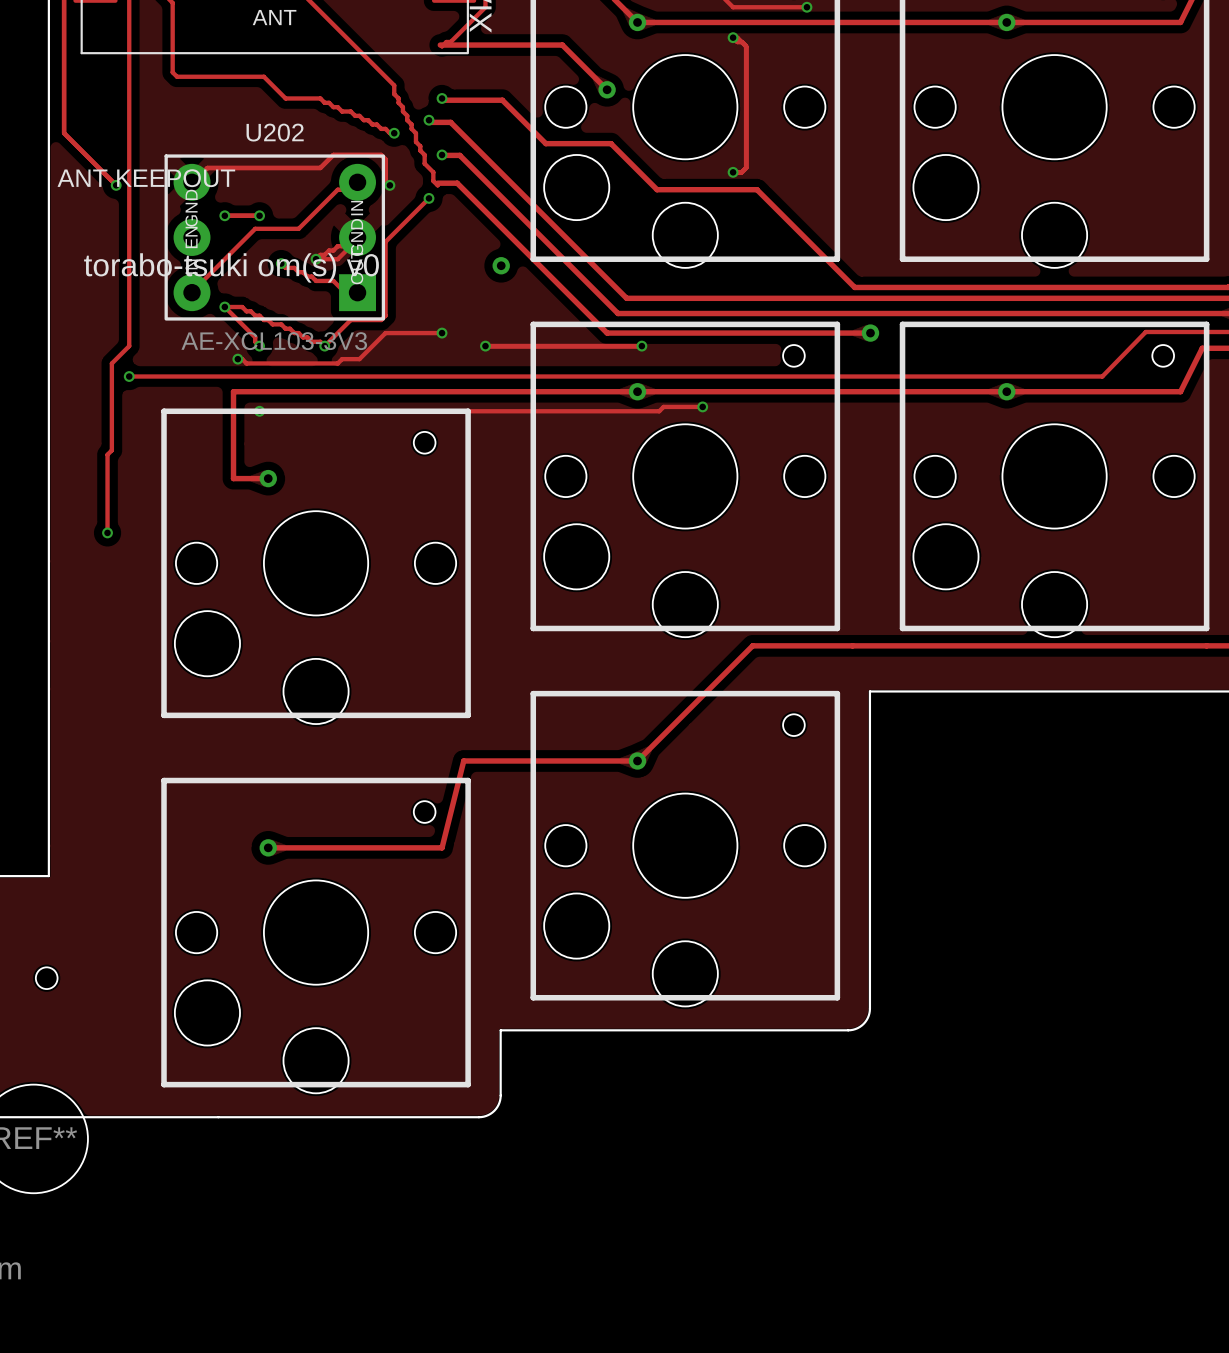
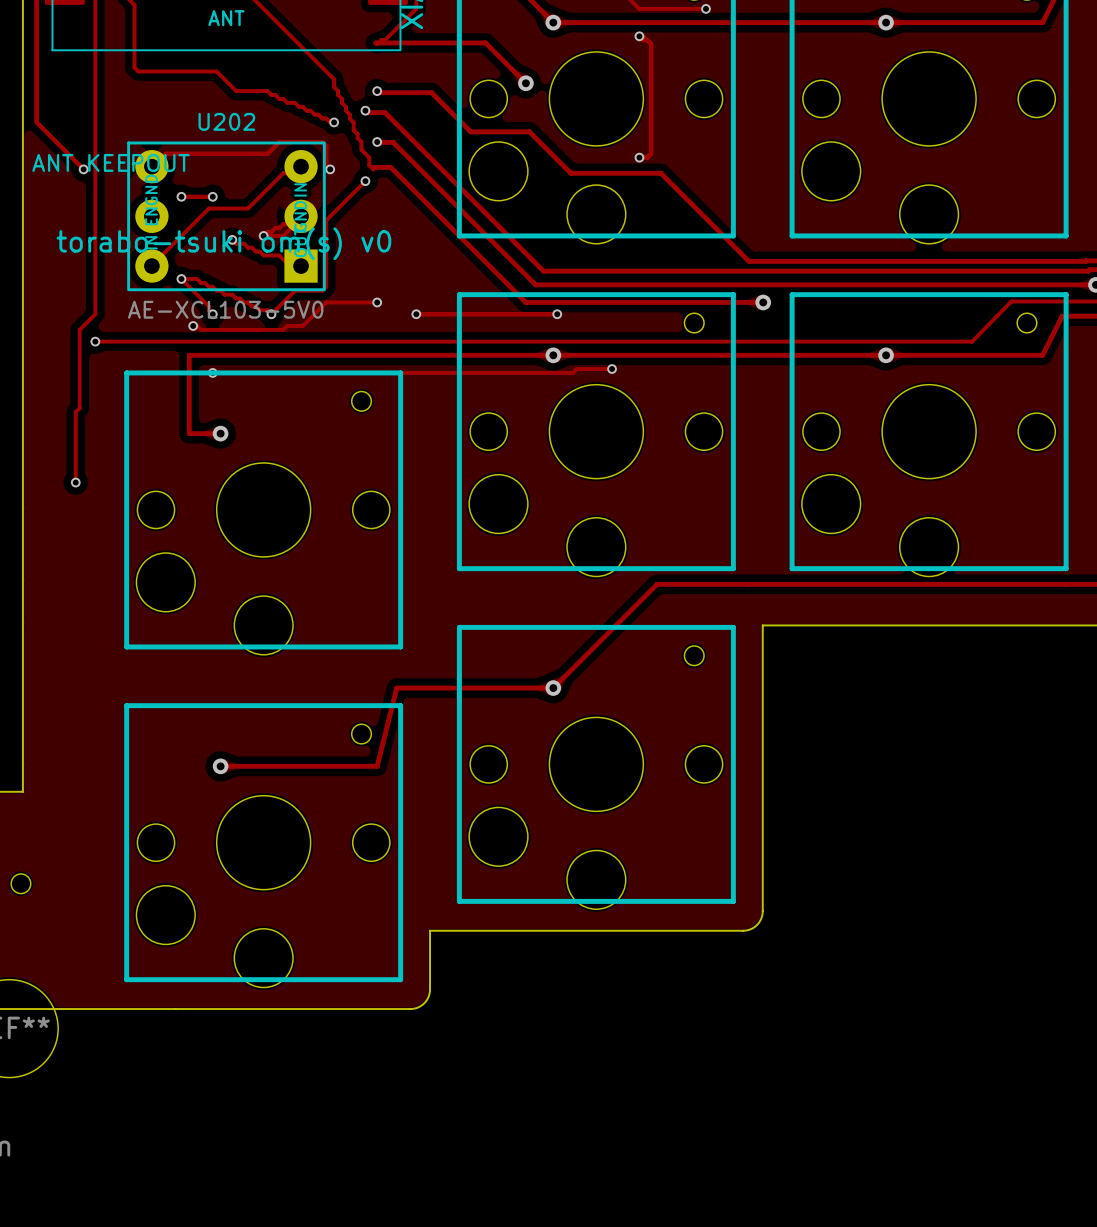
via: (501, 265) -> none
U202 value: AE-XCL103-3V3 (274, 341) -> AE-XCL103-5V0 (225, 309)

